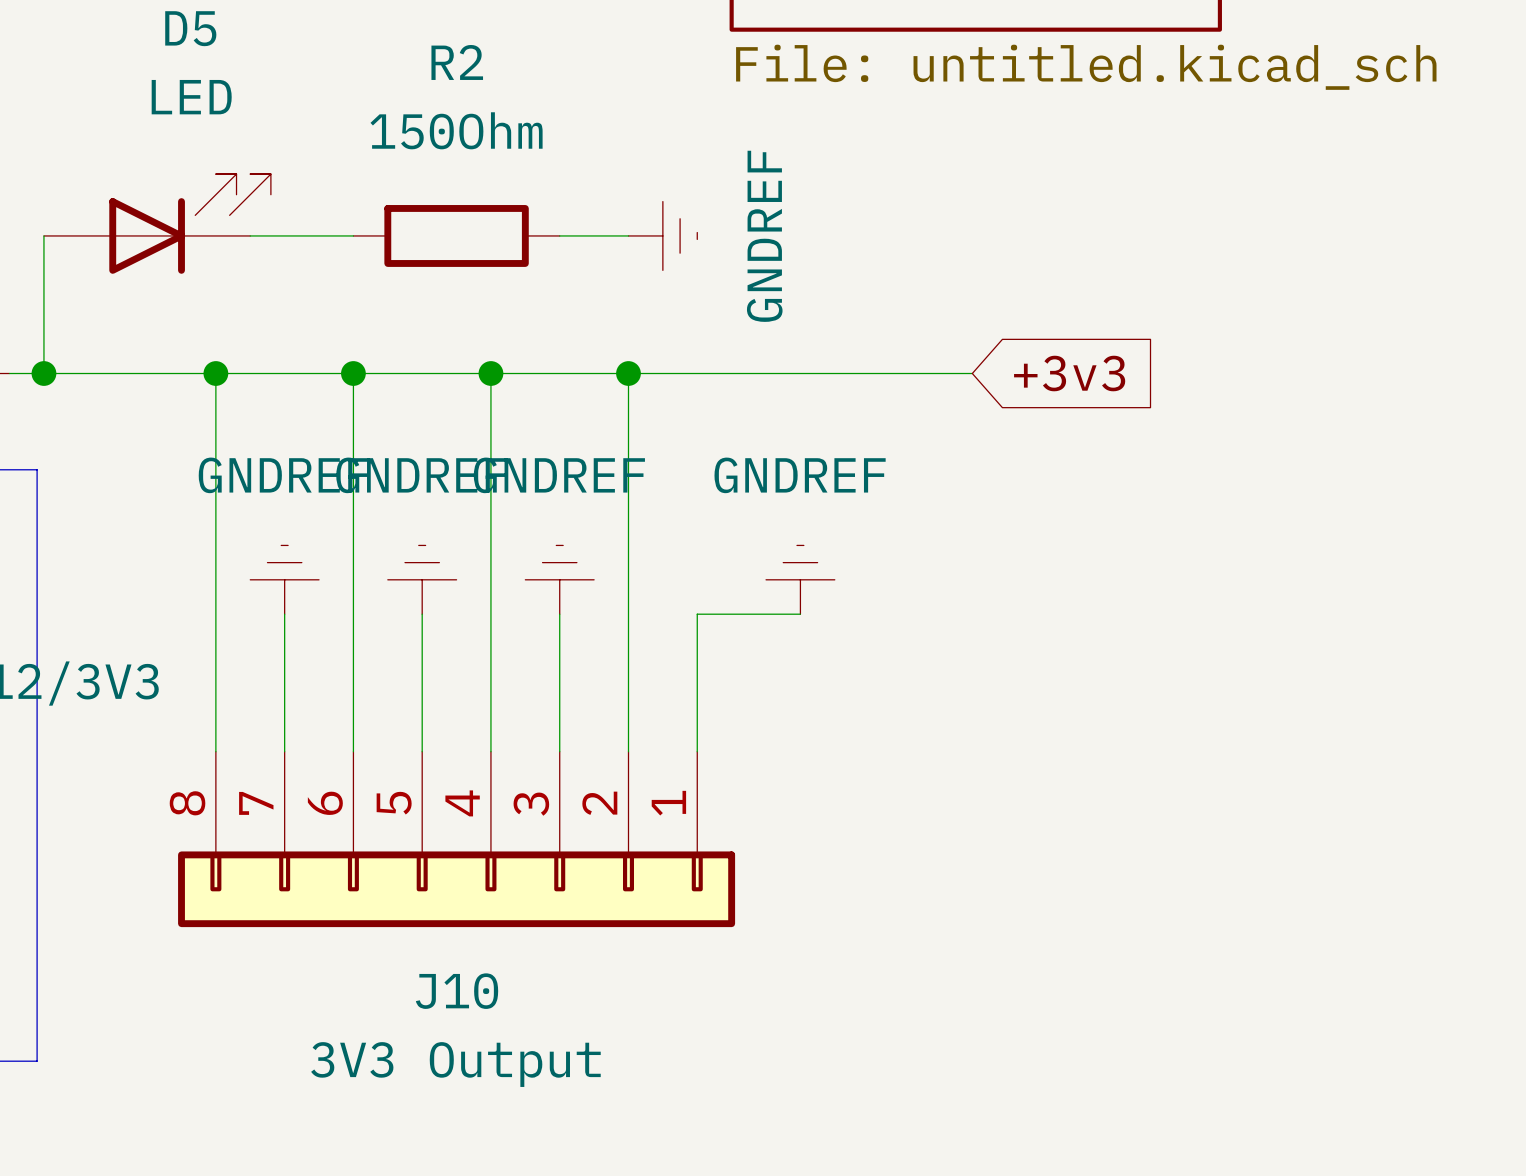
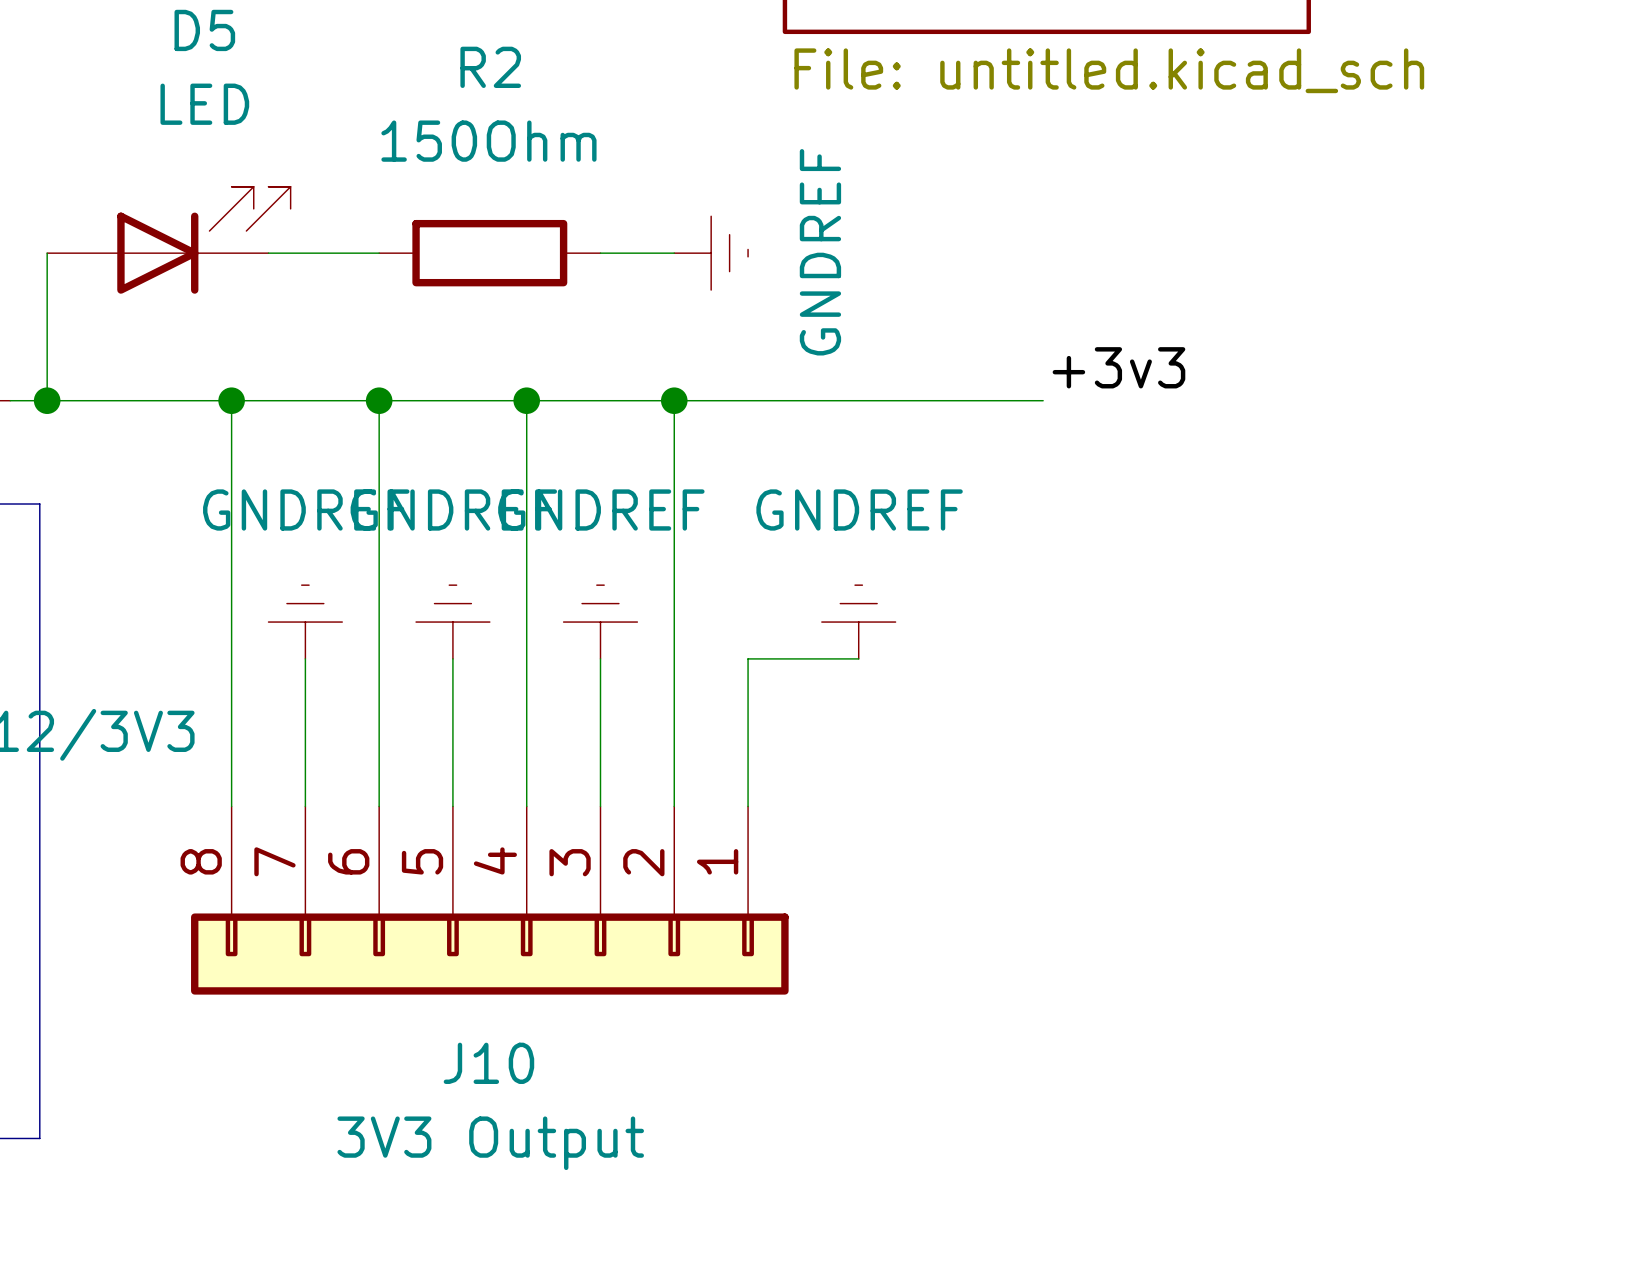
label: none -> +3v3 (1118, 367)
global label: +3v3 (1069, 373) -> none

